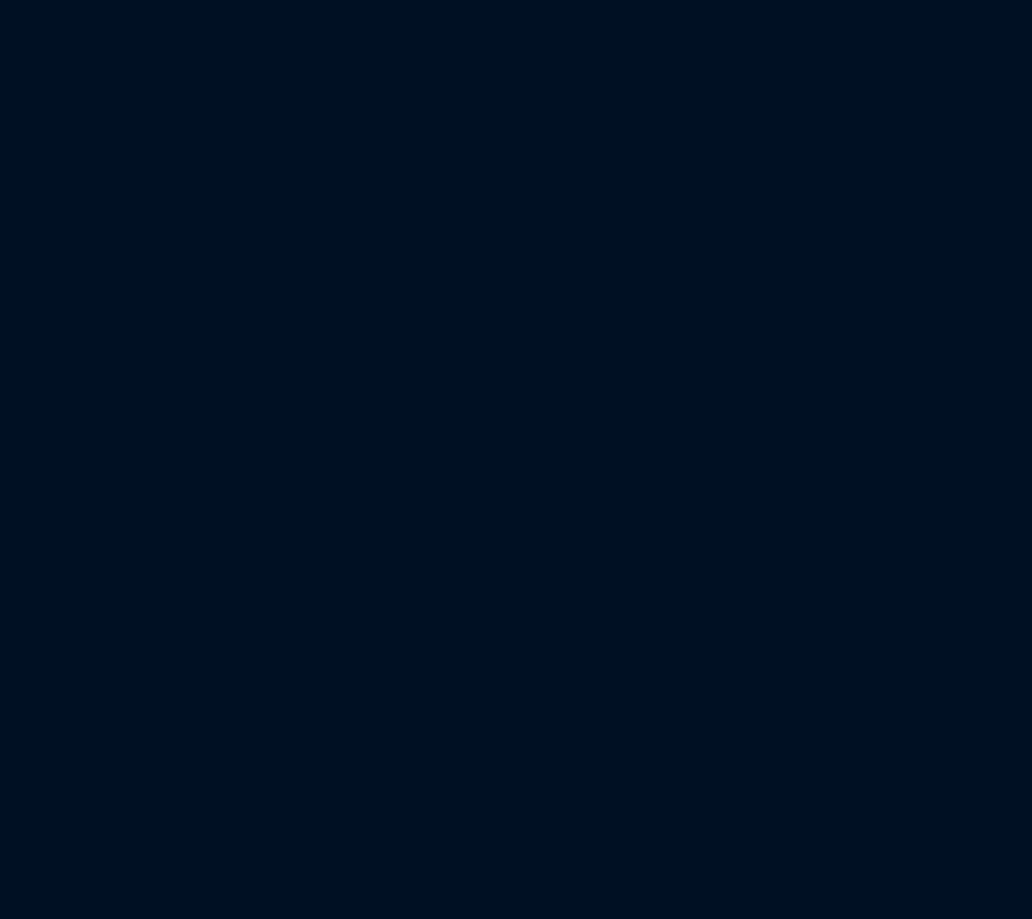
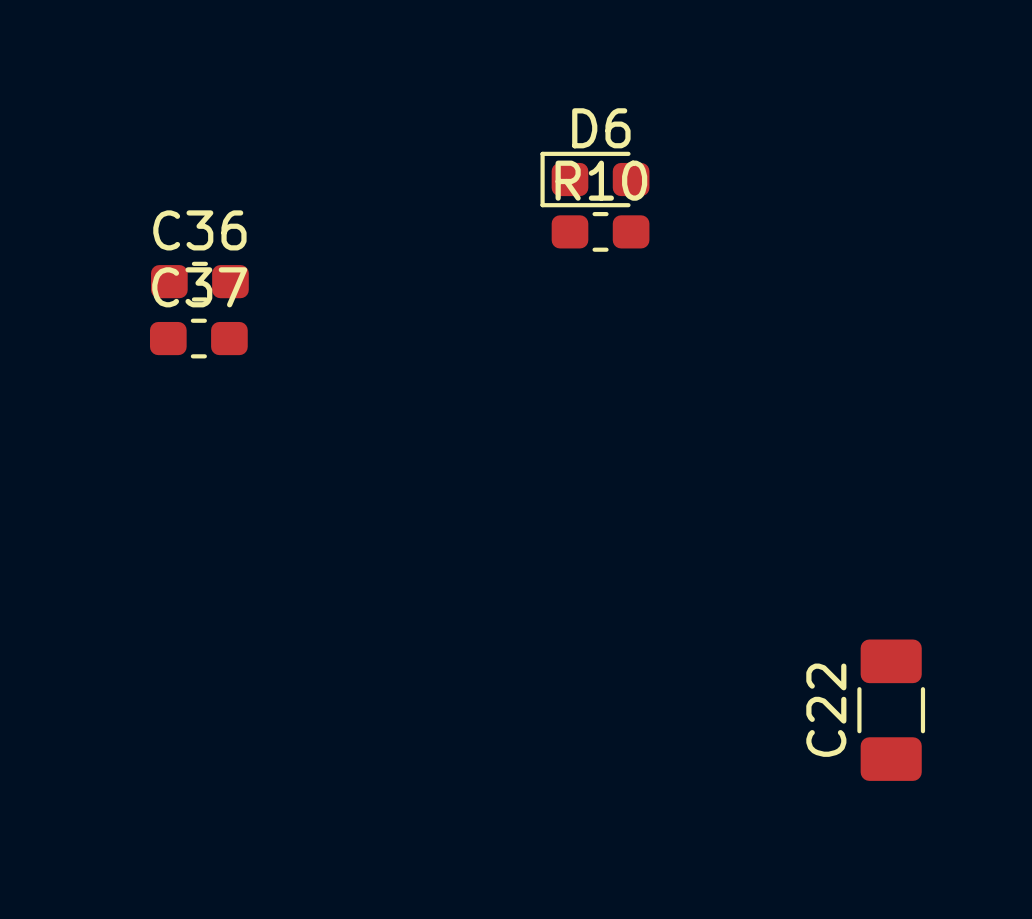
D6: none -> (594, 179)
R10: none -> (600, 231)
C36: none -> (199, 281)
C37: none -> (198, 338)
C22: none -> (891, 710)

